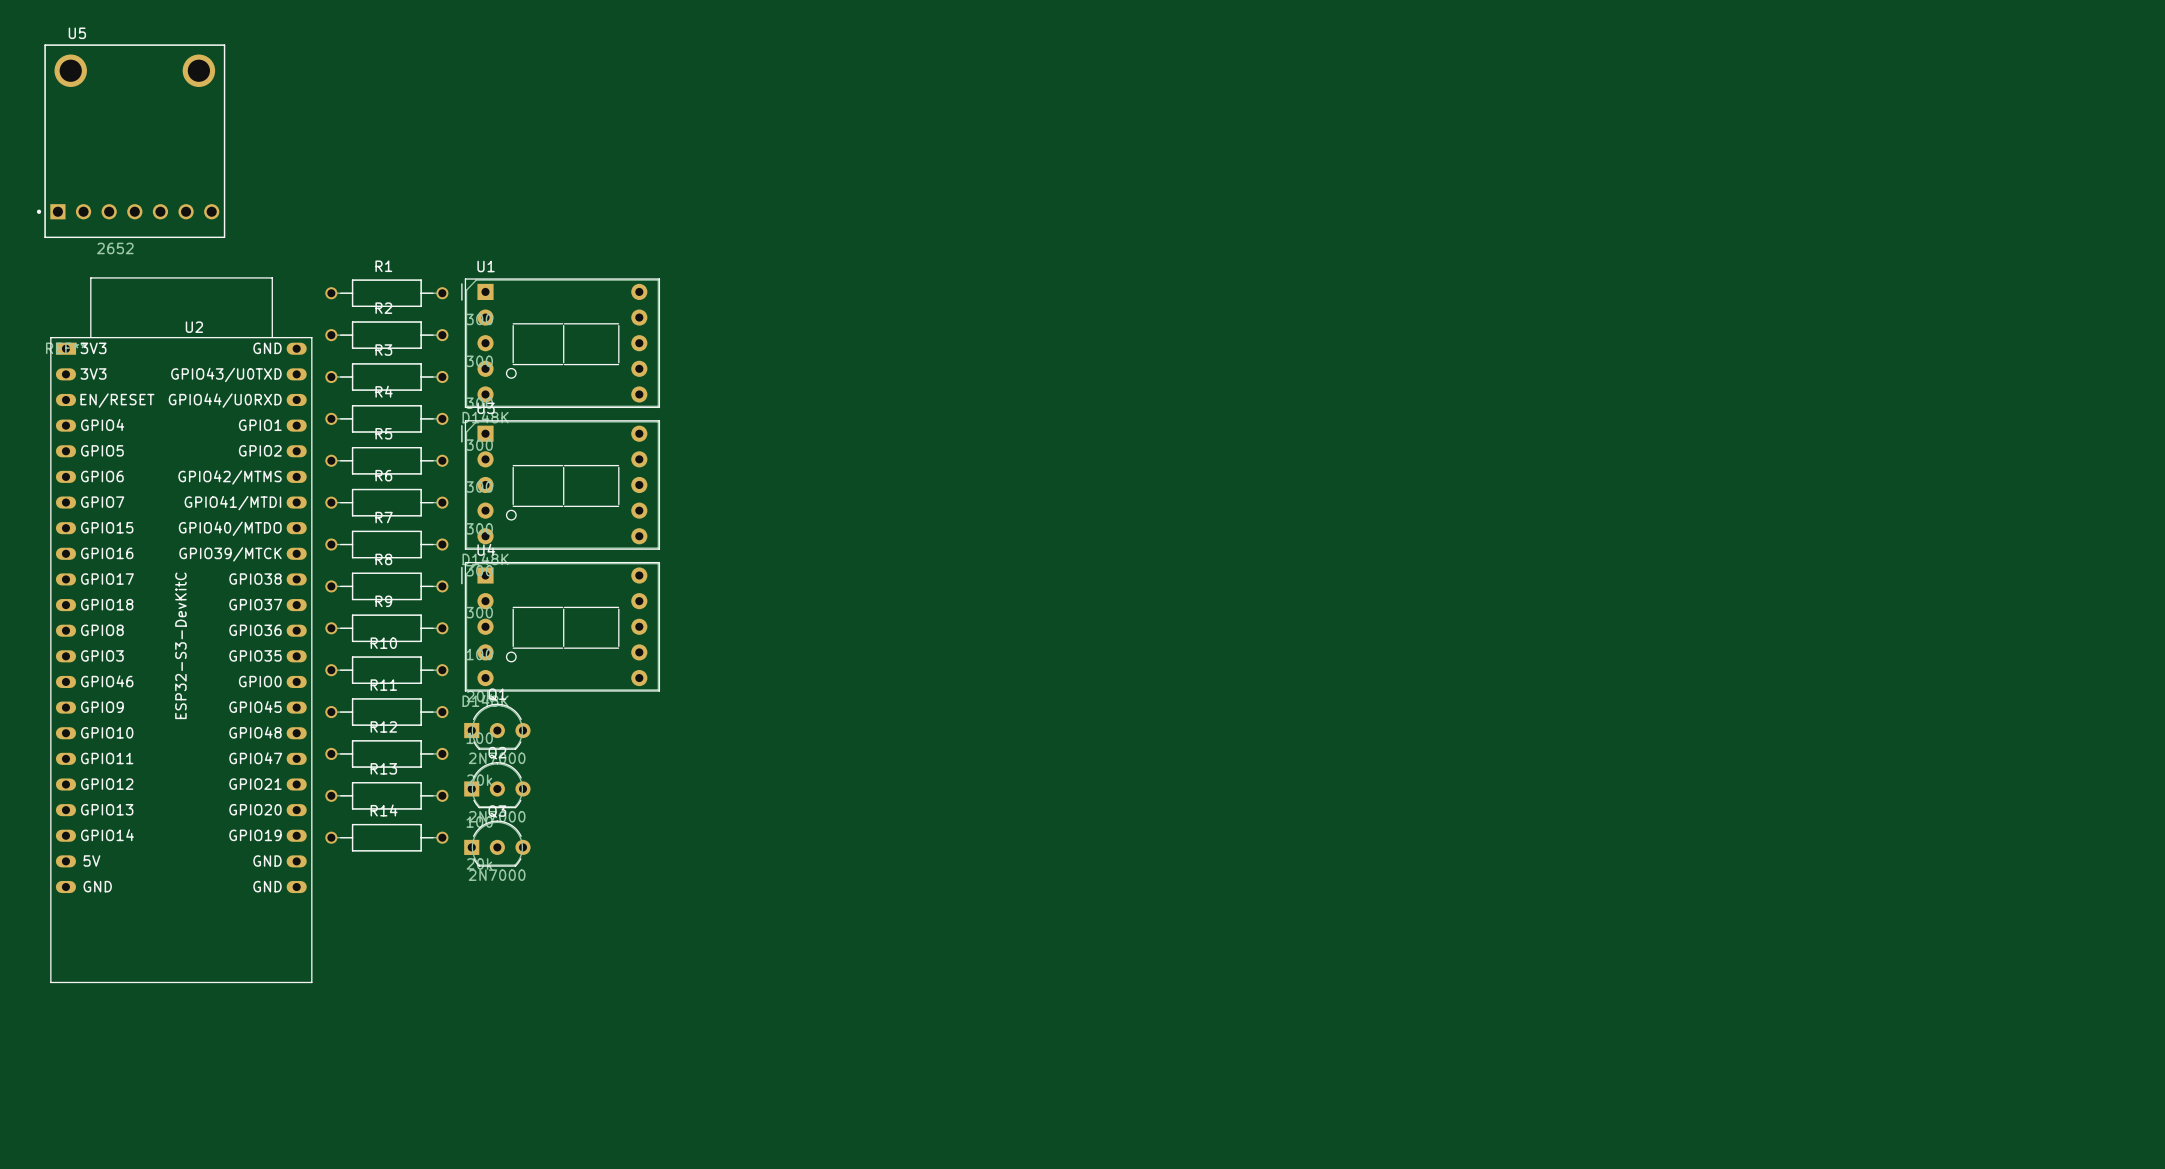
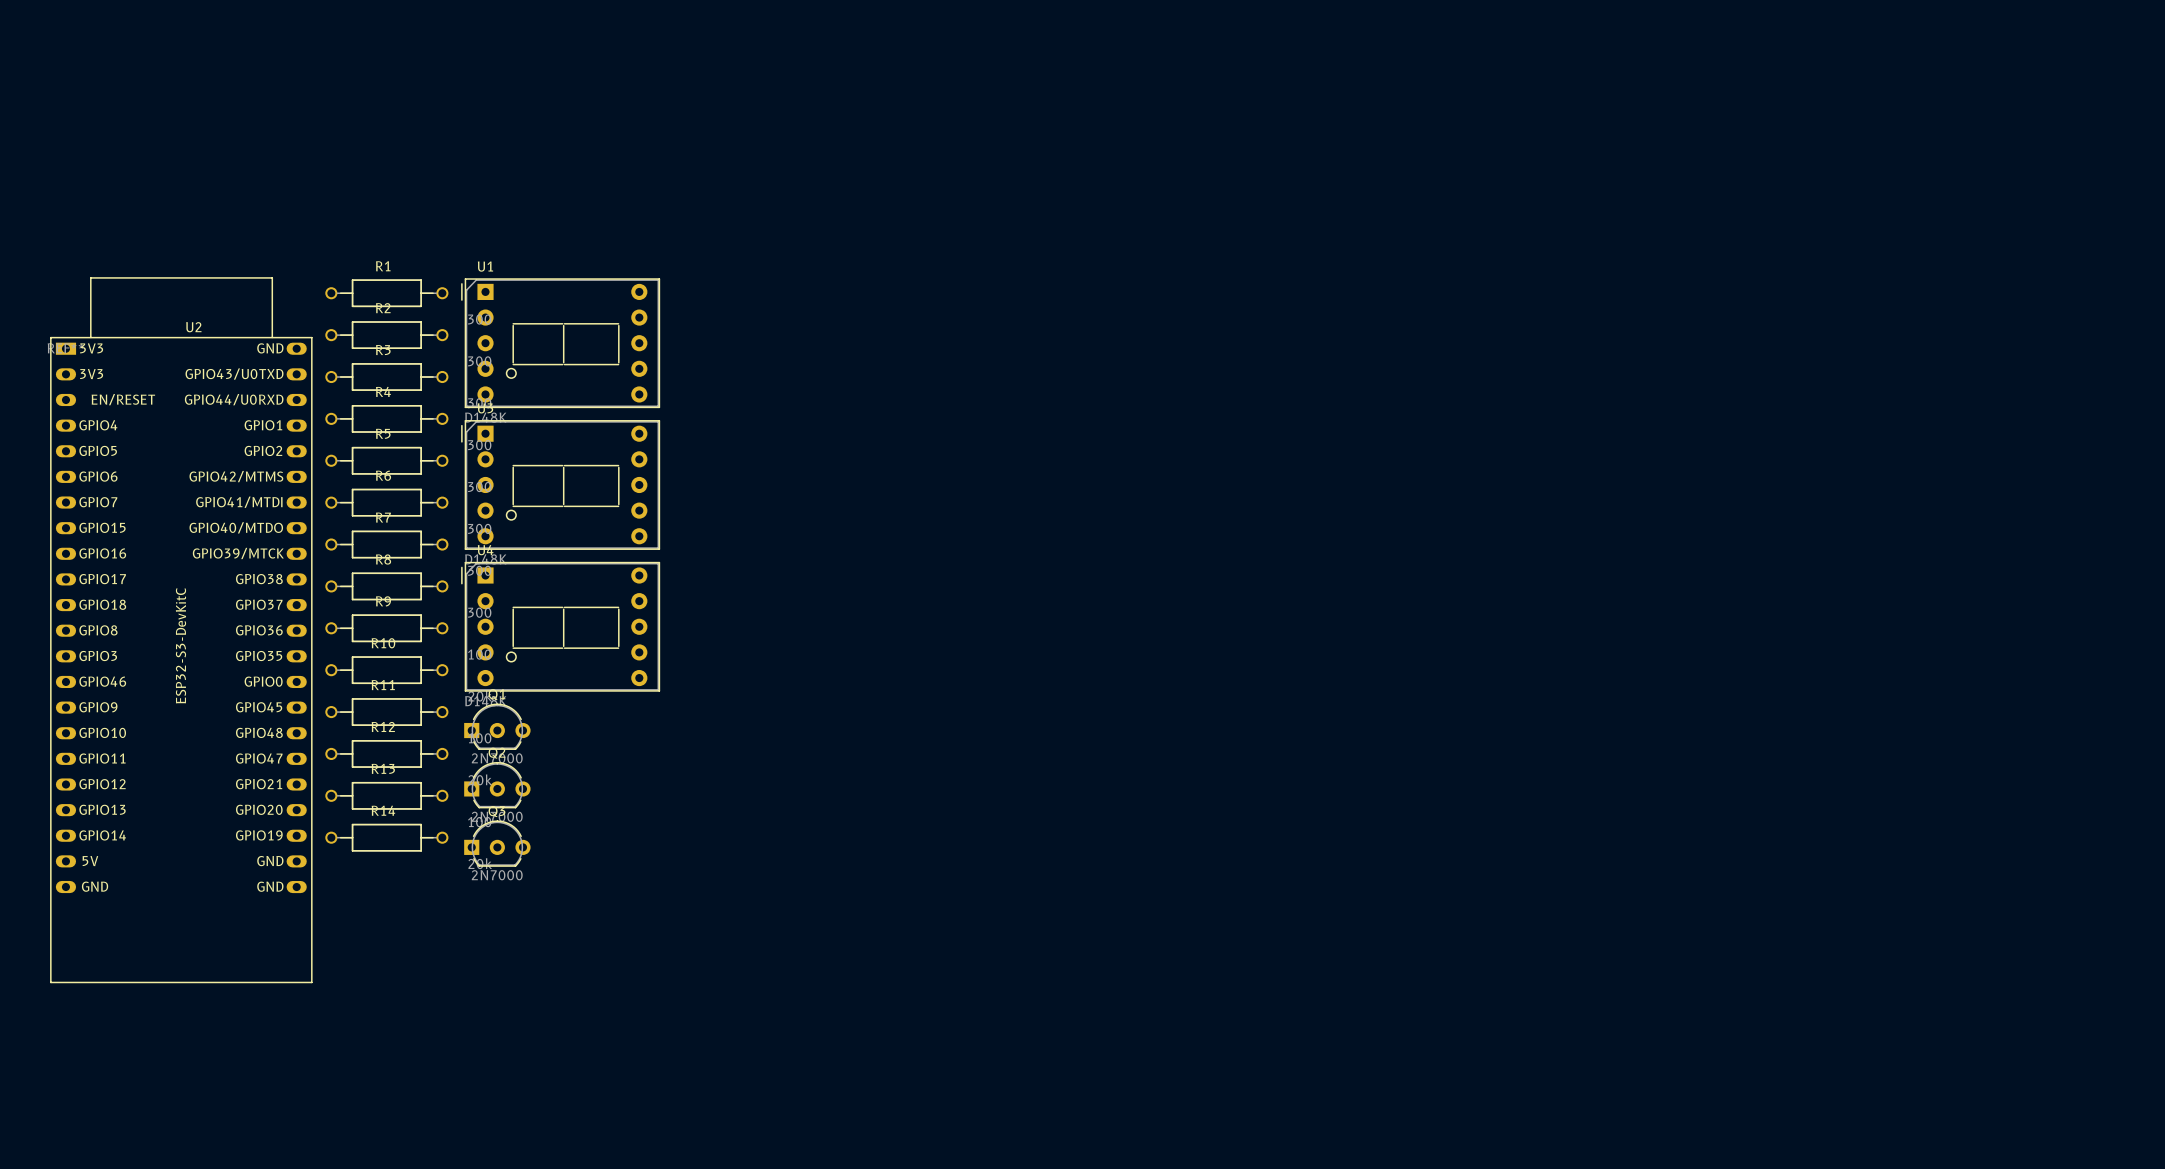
U5: 2652 (131, 141) -> none

